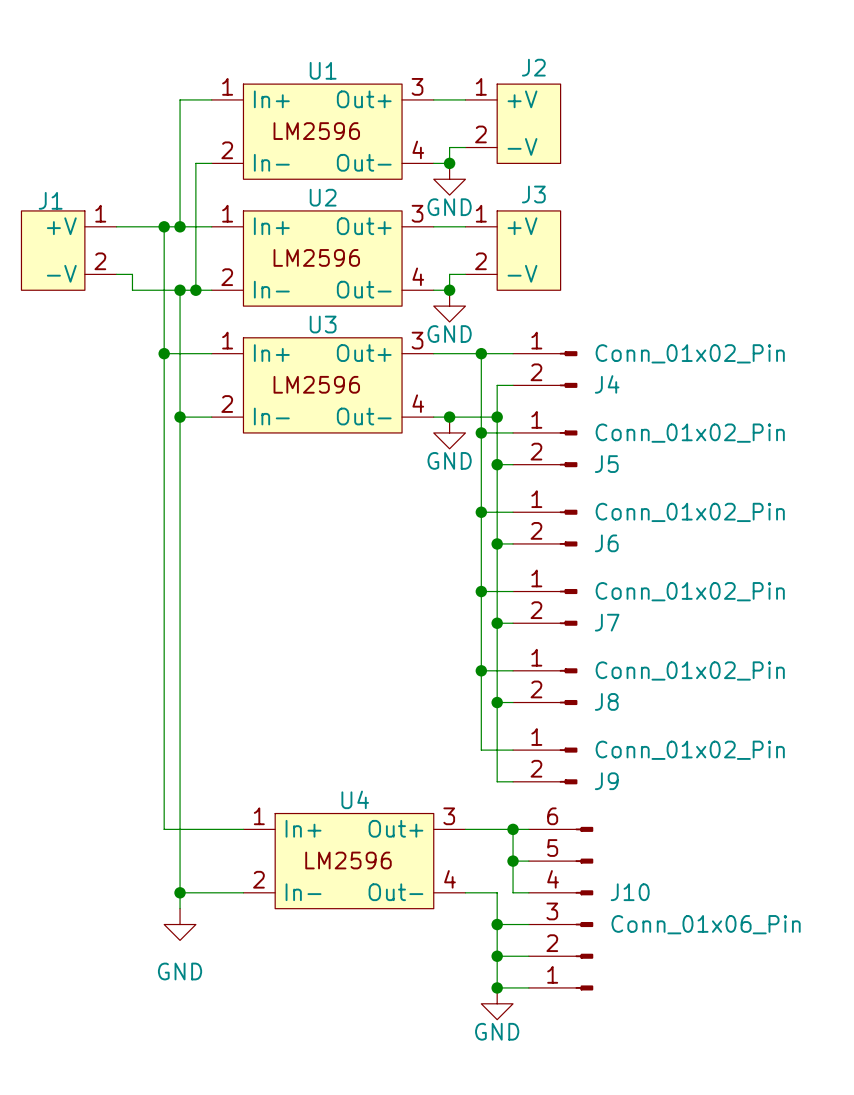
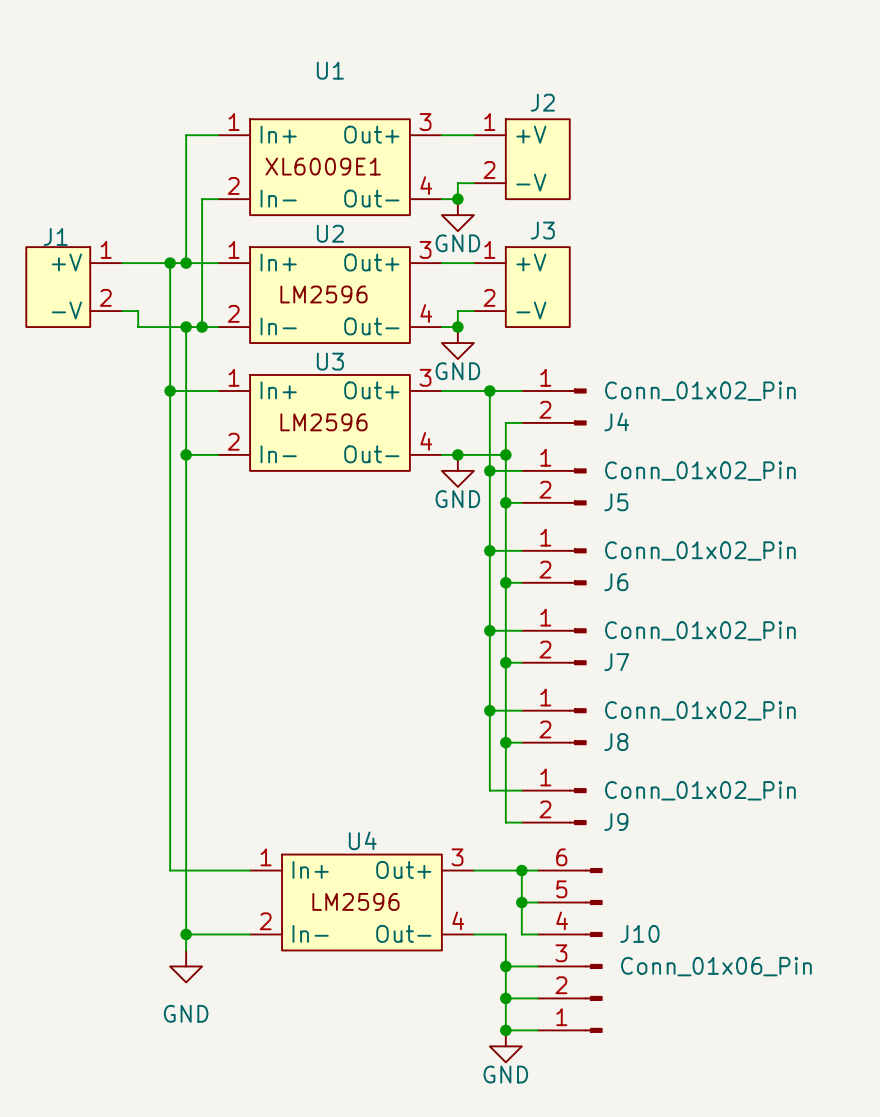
U1 name position: U1 (323, 70) -> U1 (330, 70)
U1 text: LM2596 (316, 131) -> XL6009E1 (323, 166)

